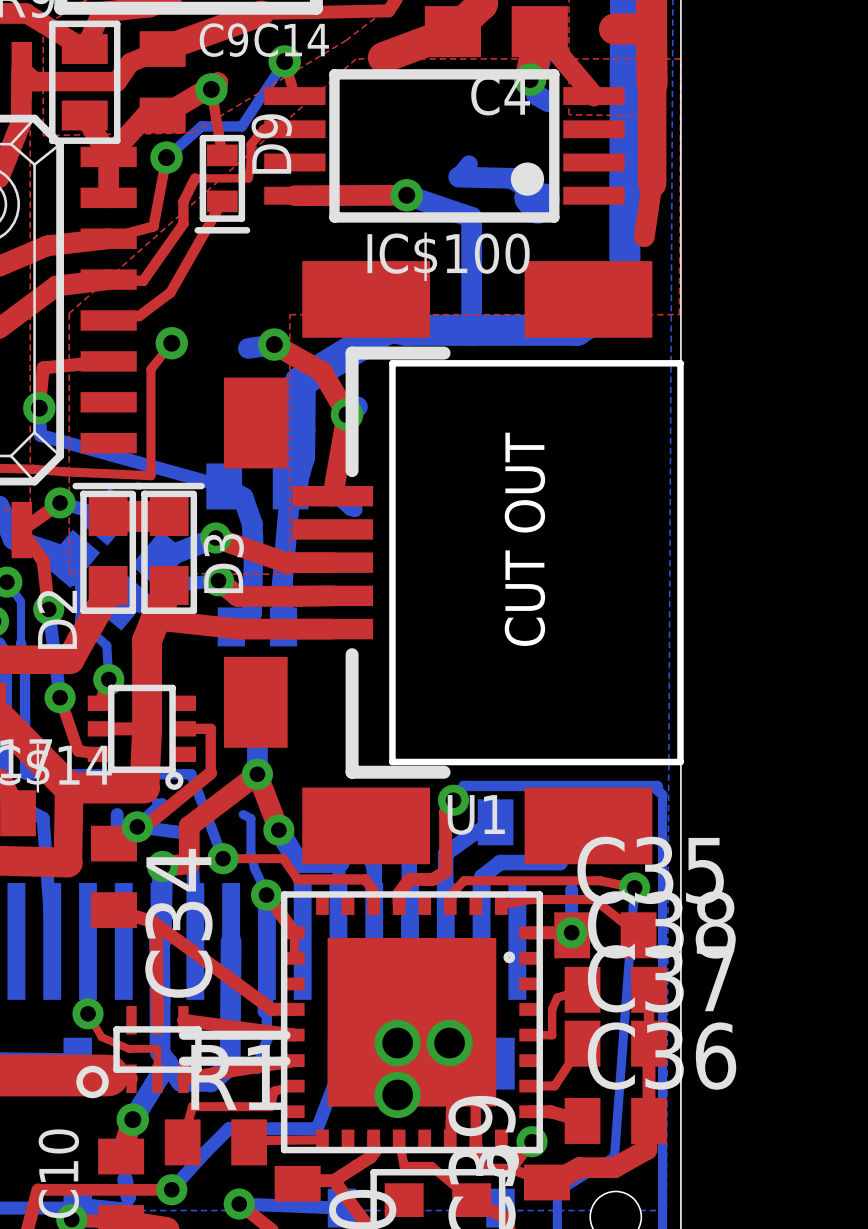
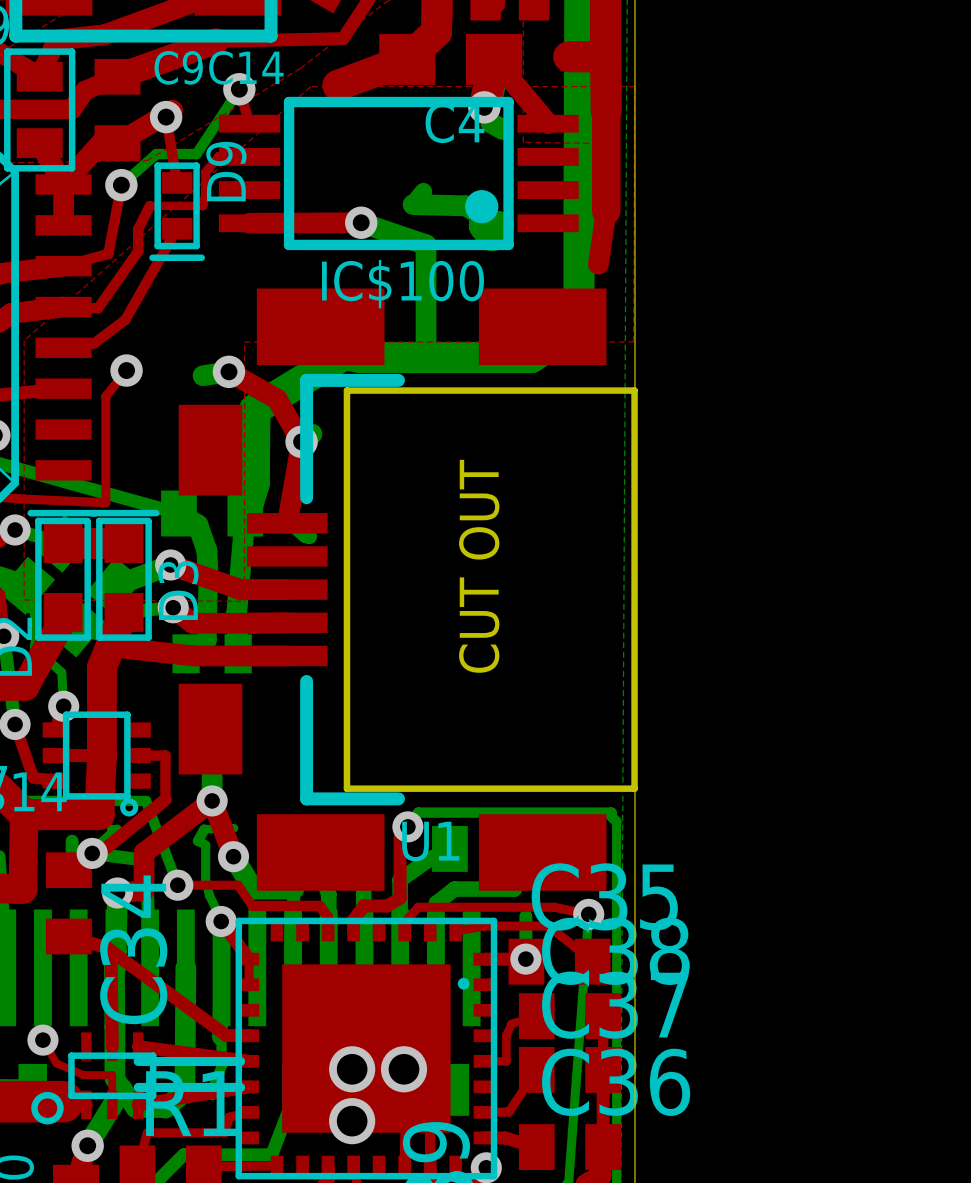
bottom track: none -> (234, 828) (204, 829) (197, 841)

